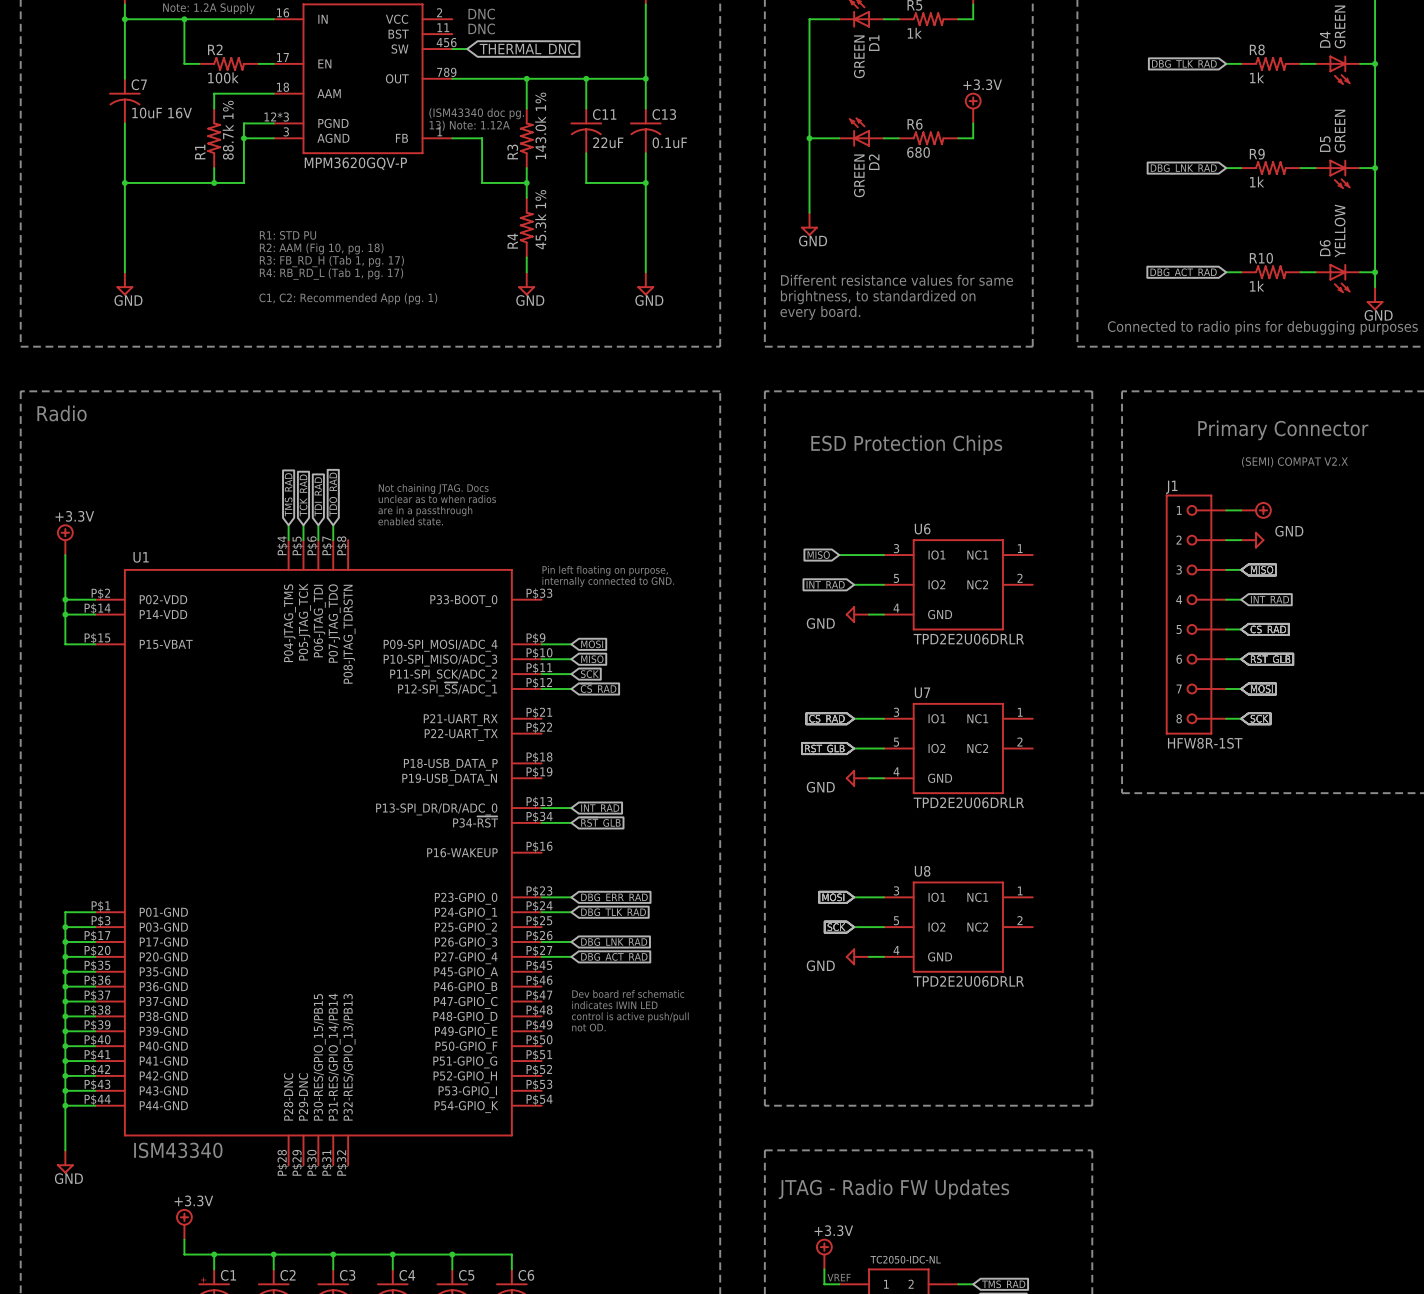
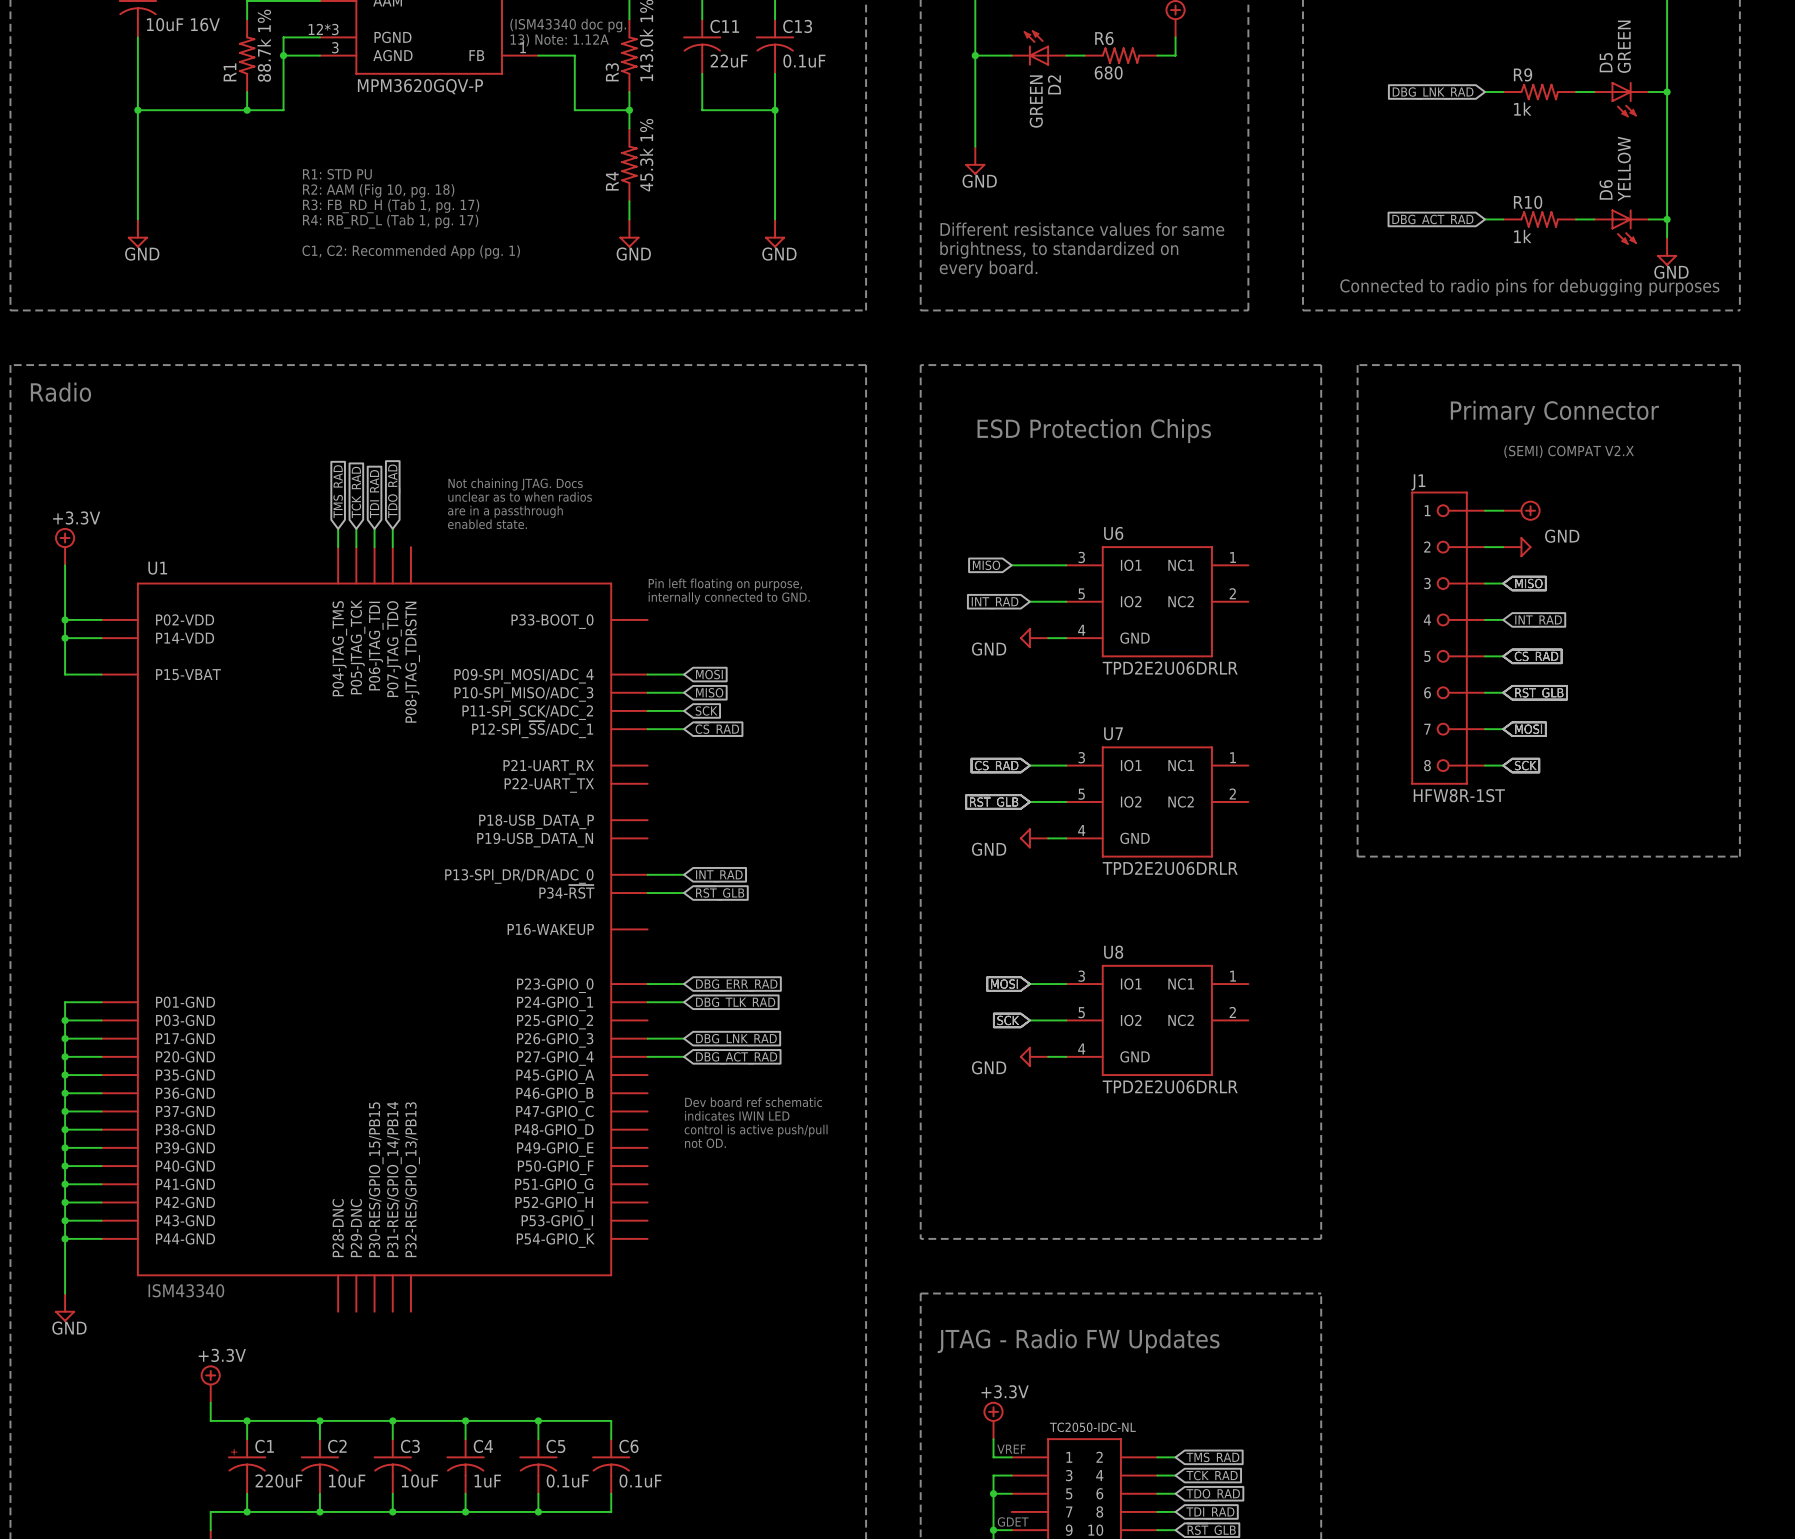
U1 symbol: [95, 540, 542, 1166] -> [101, 547, 648, 1312]

